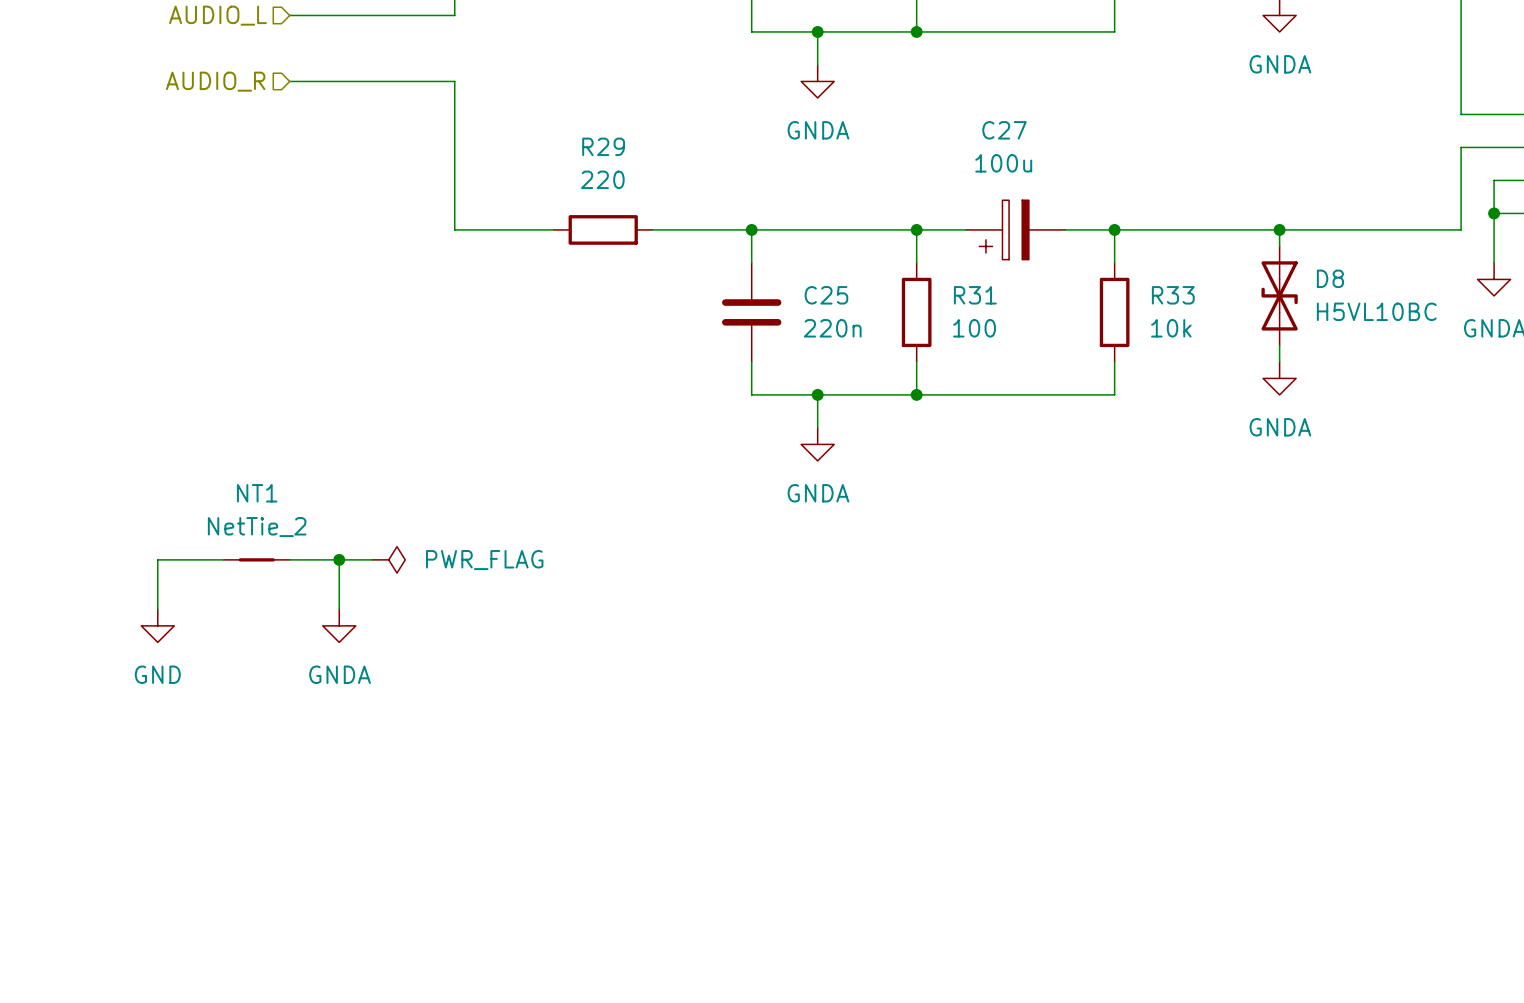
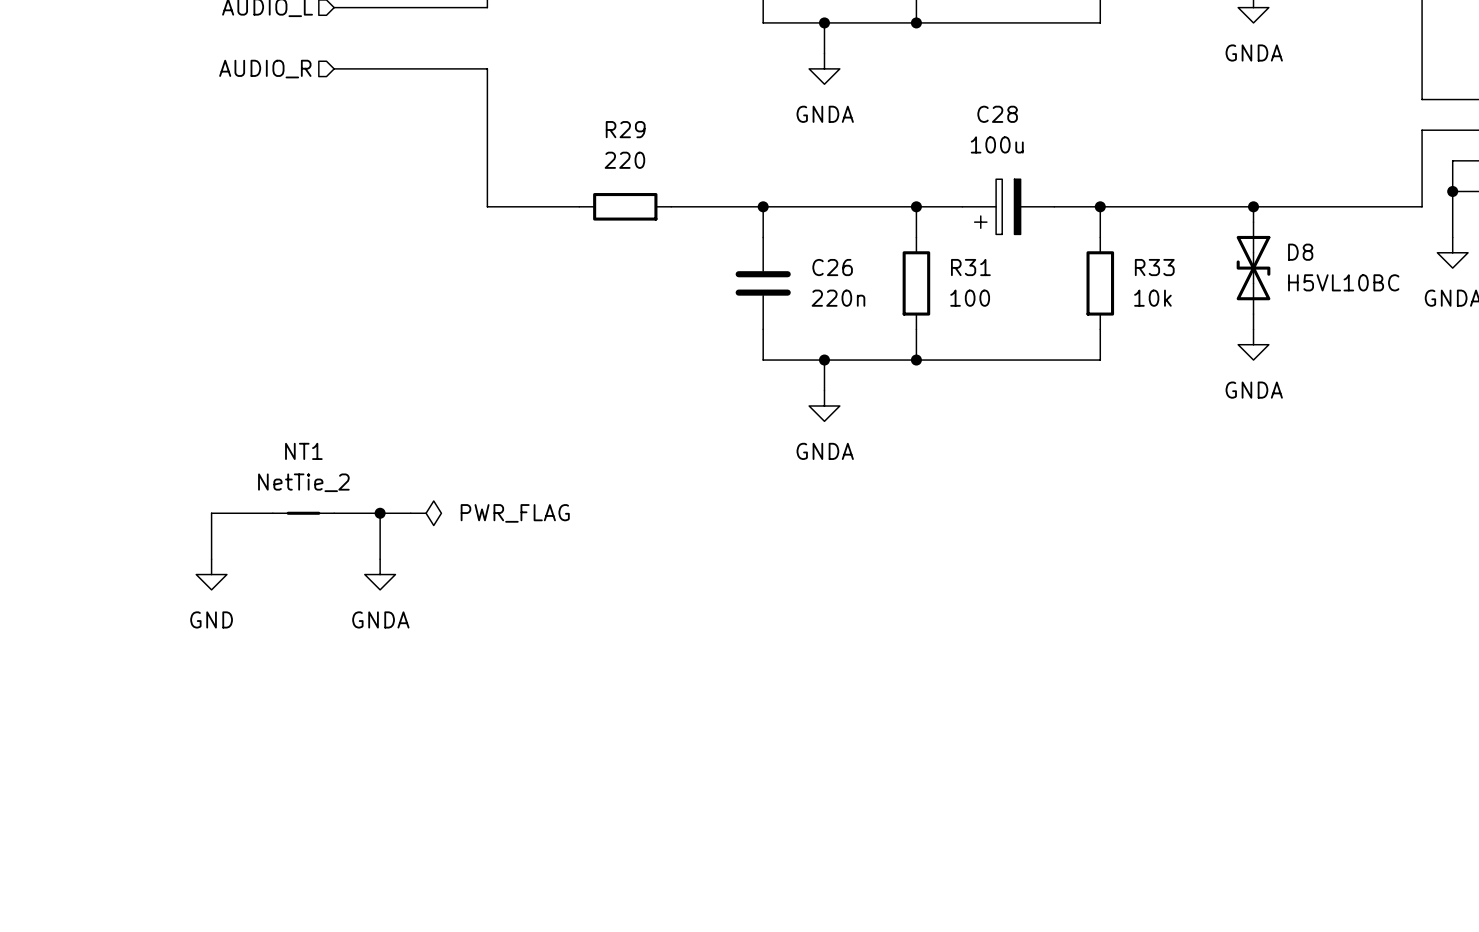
C27 name: C27 (1004, 130) -> C28 (997, 114)
C25 name: C25 (826, 295) -> C26 (832, 267)

